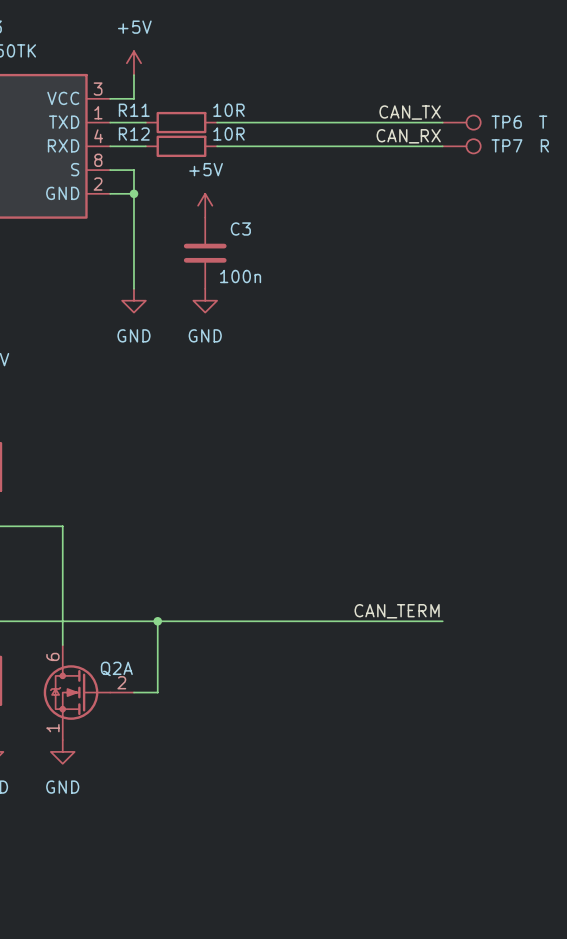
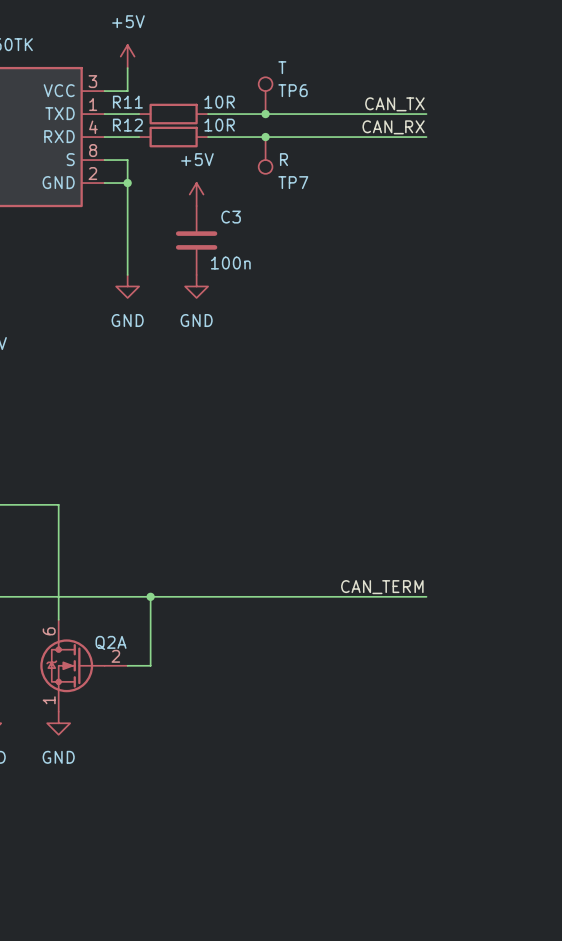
junction: none -> (265, 114)
TP6 position: (461, 122) -> (265, 95)
TP6 rotation: 0° (473, 122) -> 90° counterclockwise (265, 84)
TP6 value position: T (543, 122) -> T (282, 67)
TP7 name position: TP7 (506, 145) -> TP7 (293, 182)
TP7 value position: R (544, 145) -> R (284, 159)
junction: none -> (265, 137)
TP7 position: (461, 146) -> (265, 155)
TP7 rotation: 0° (473, 146) -> 90° clockwise (265, 166)

